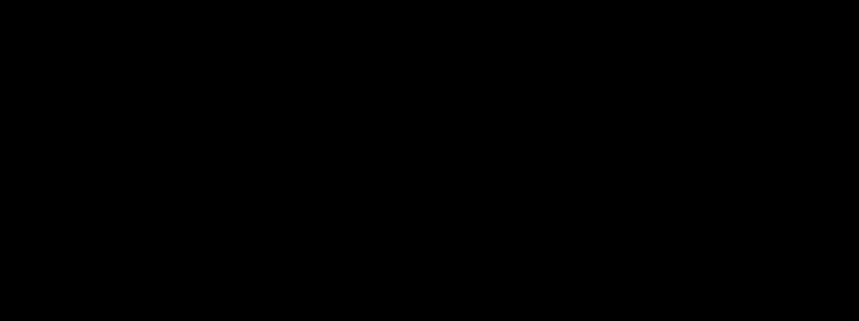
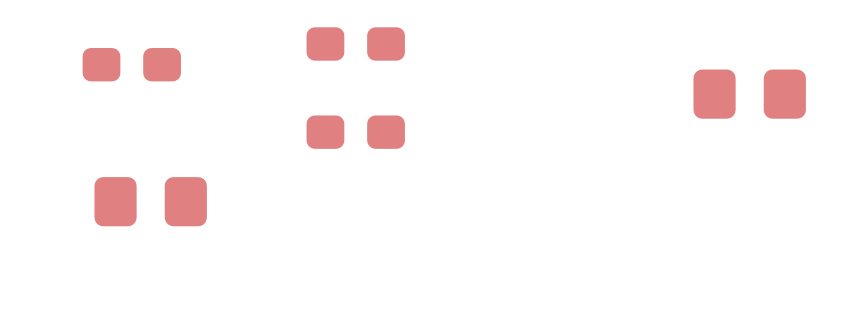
part: none -> (355, 43)
part: none -> (131, 64)
part: none -> (749, 94)
part: none -> (355, 132)
part: none -> (150, 201)

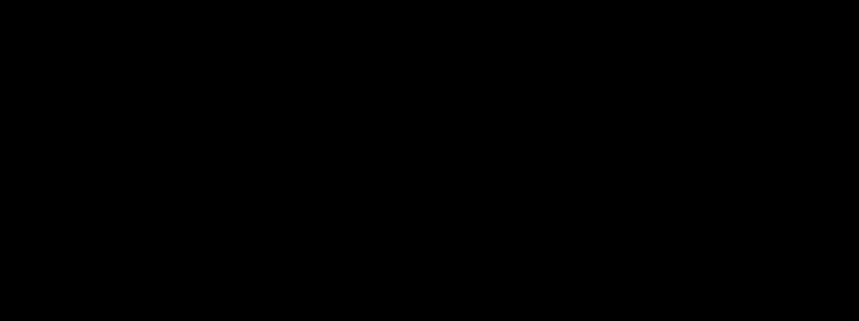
part: (355, 43) -> none
part: (131, 64) -> none
part: (749, 94) -> none
part: (355, 132) -> none
part: (150, 201) -> none

